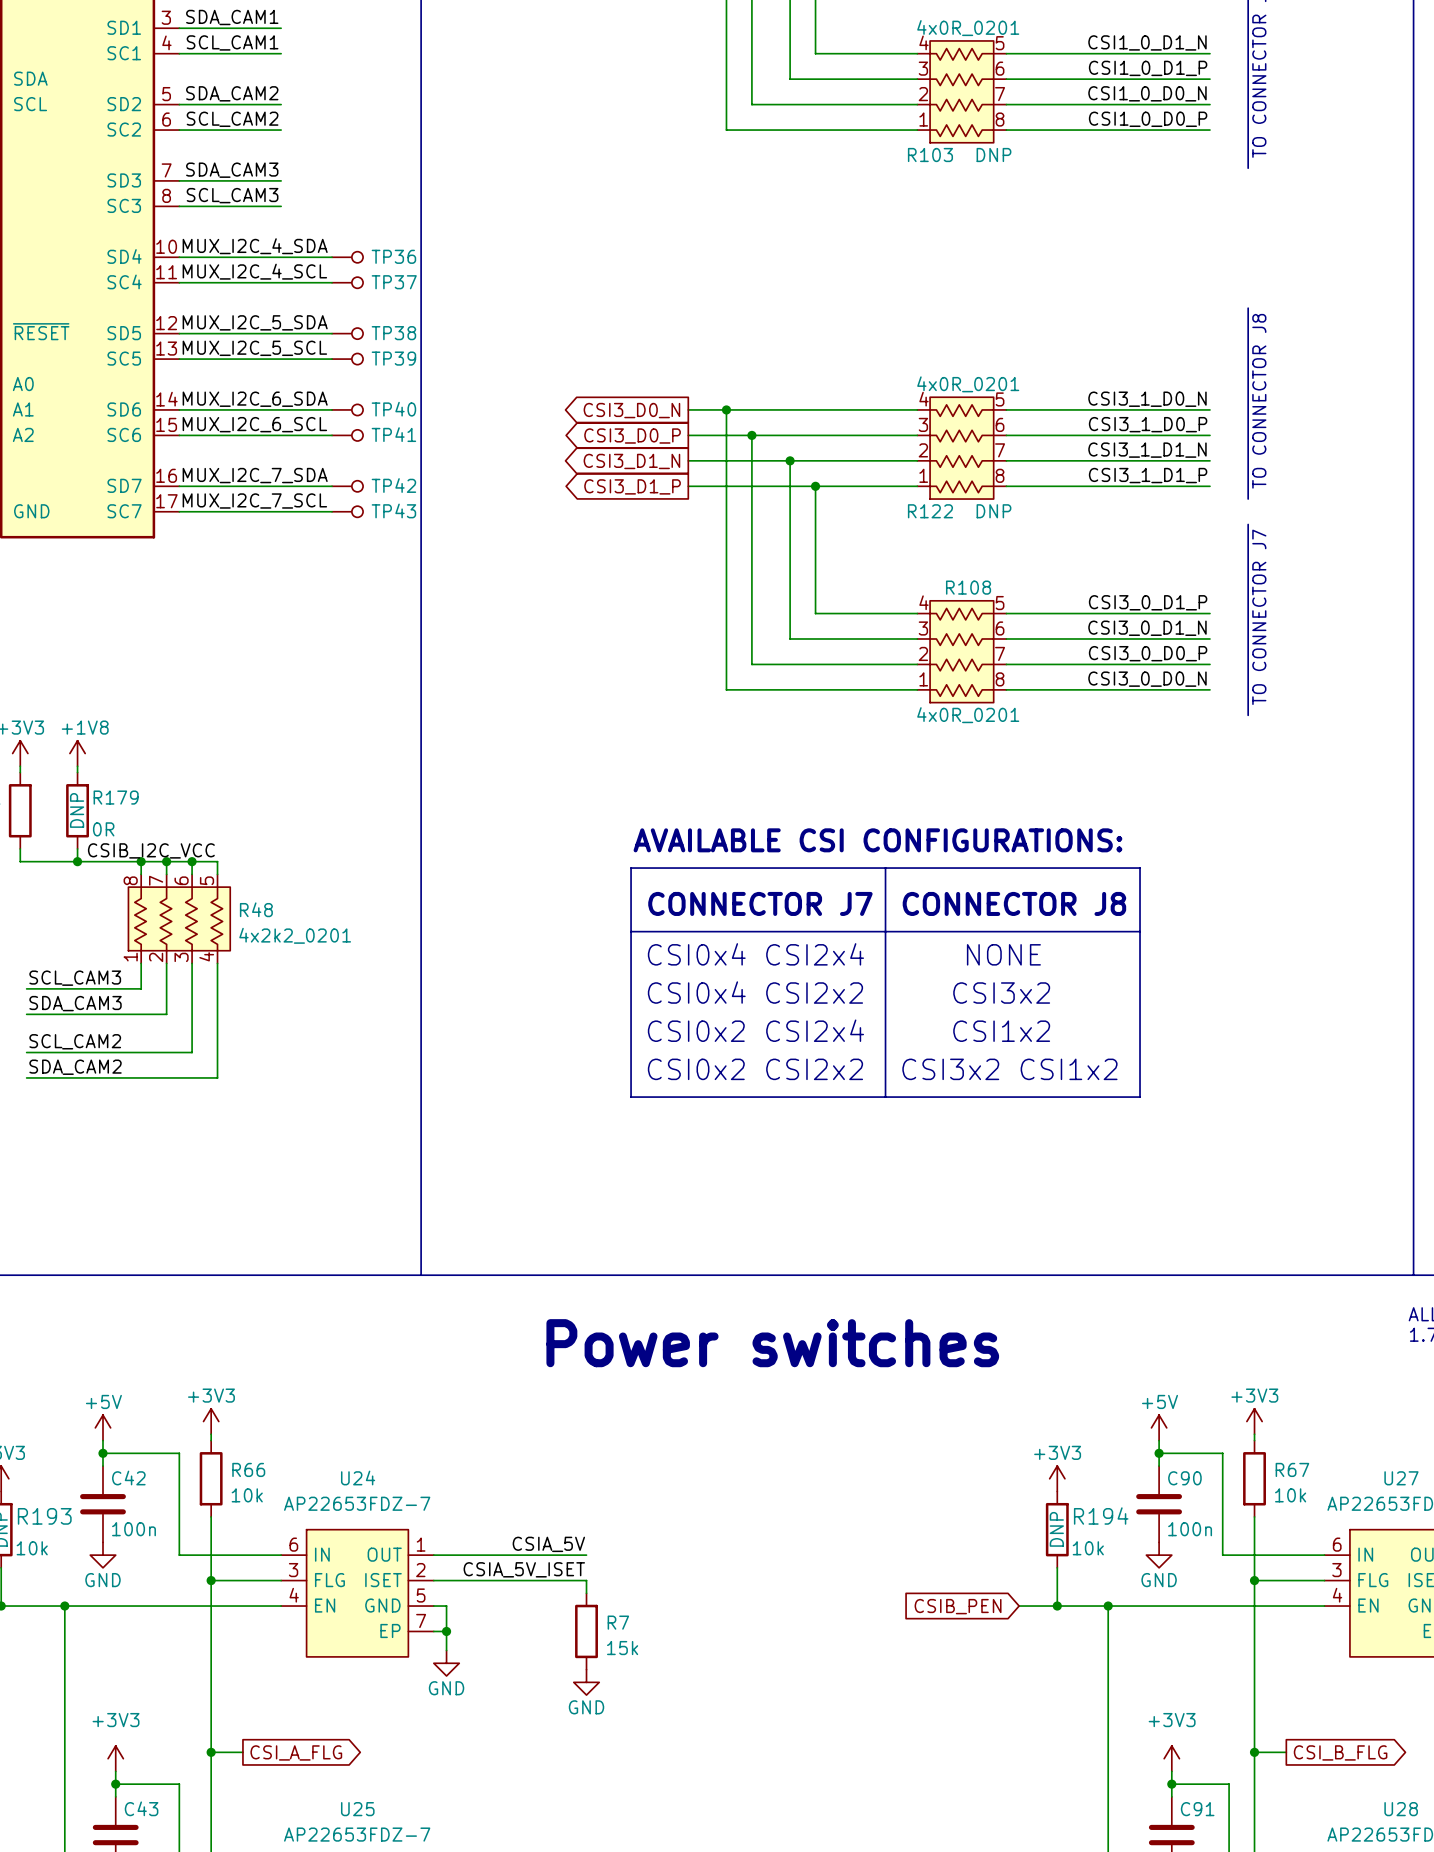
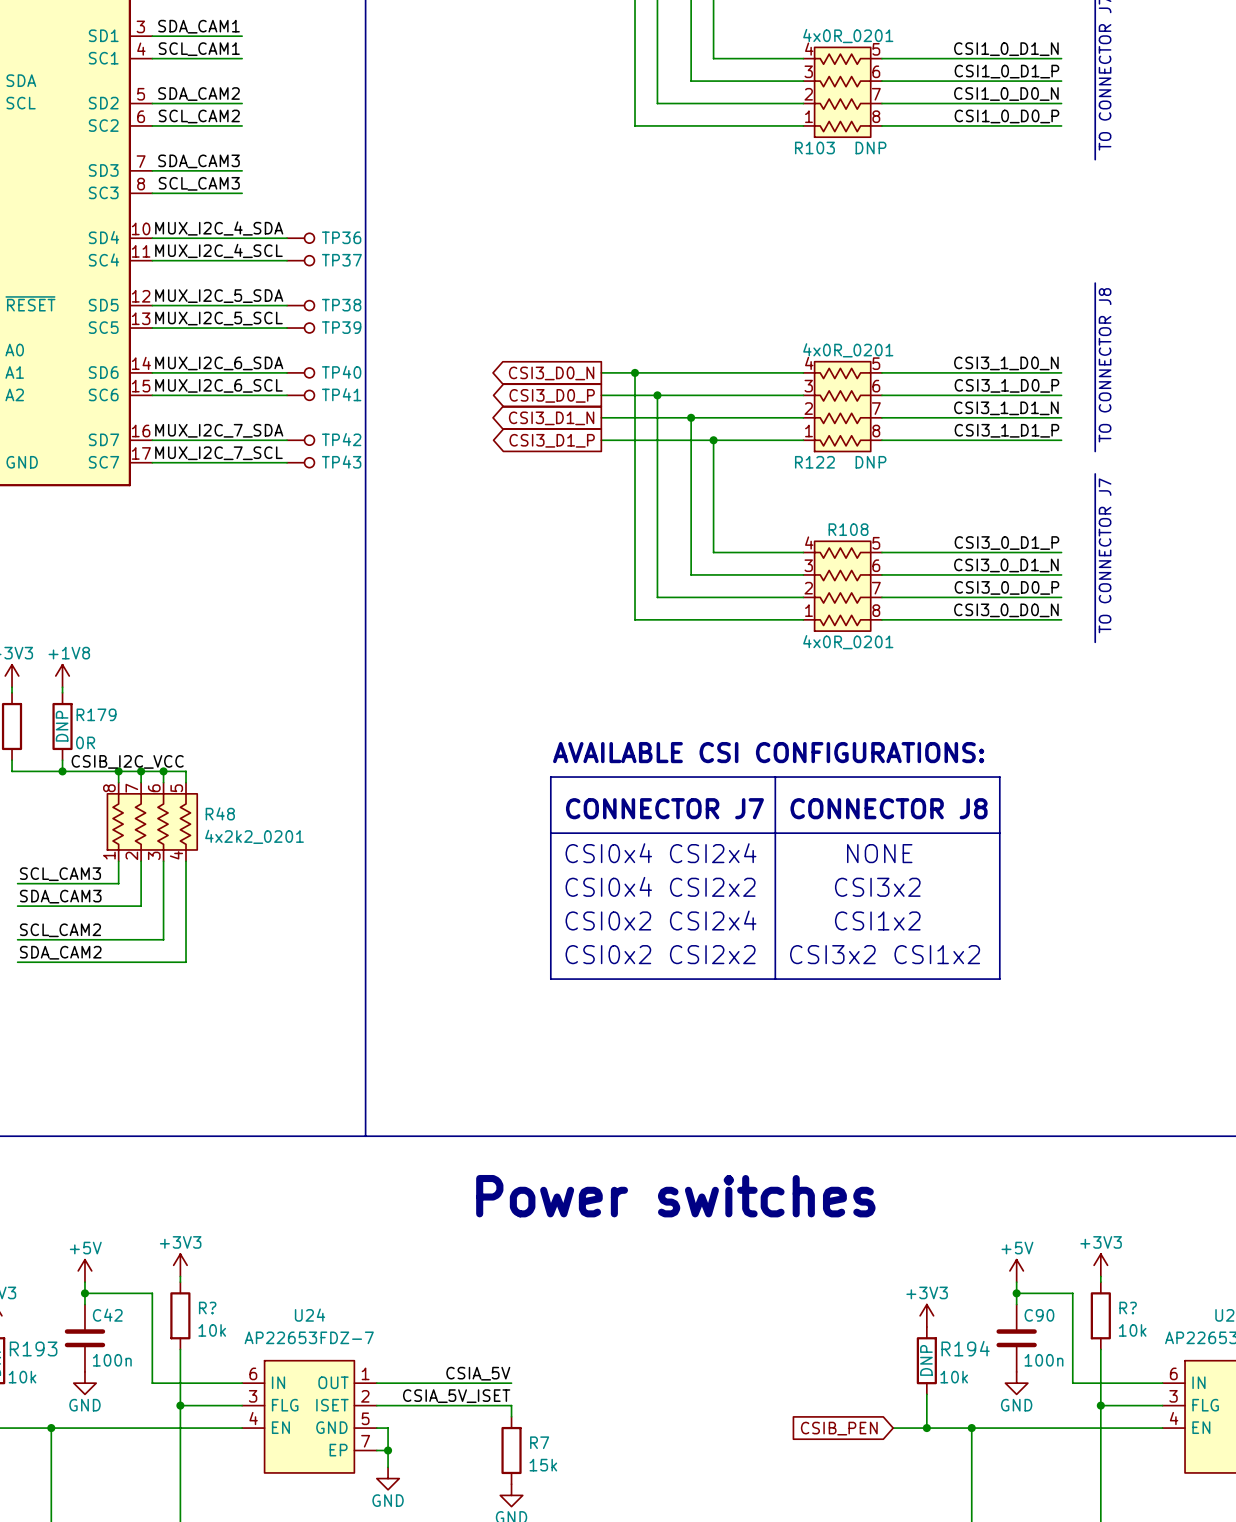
R66 name: R66 (248, 1469) -> R? (207, 1308)
R67 name: R67 (1292, 1469) -> R? (1128, 1308)

